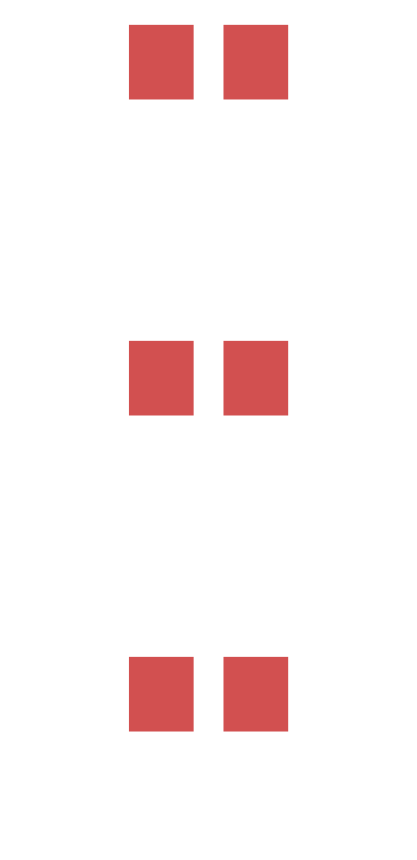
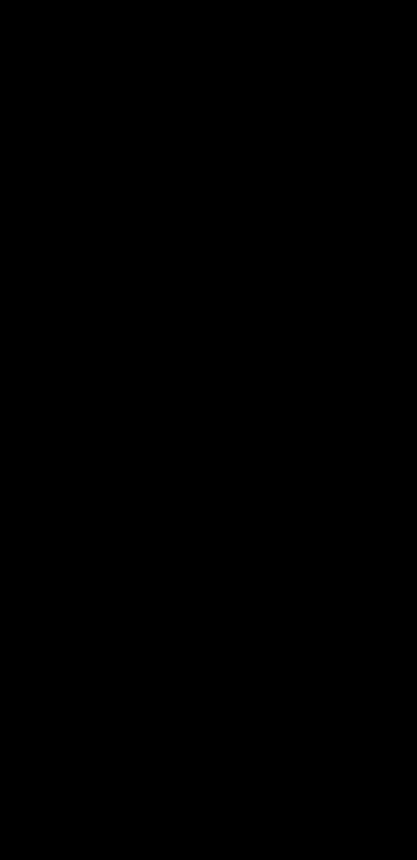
part: (208, 62) -> none
part: (208, 378) -> none
part: (208, 694) -> none

